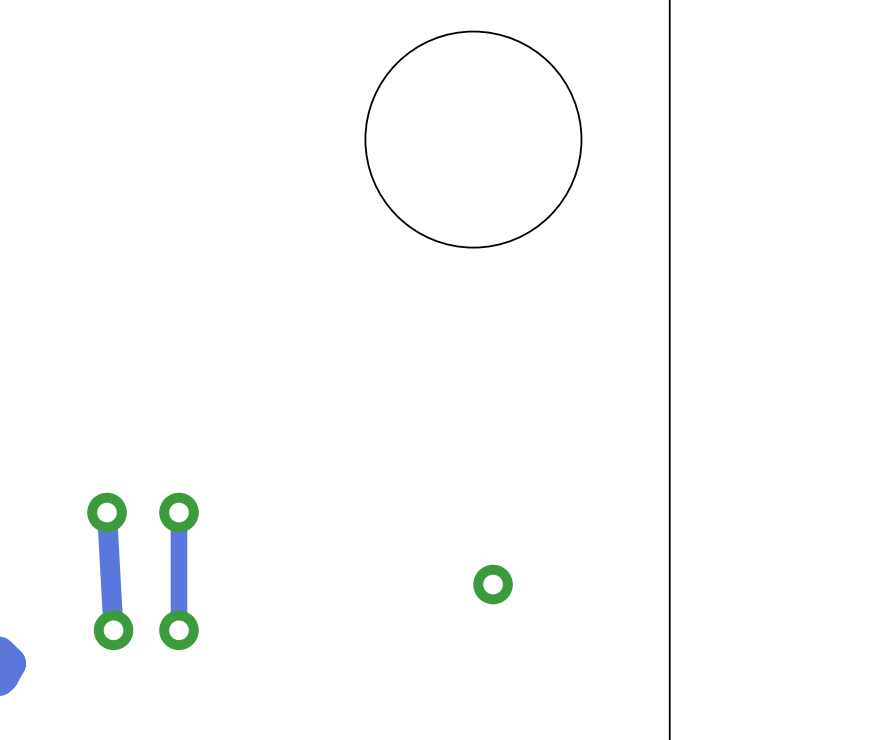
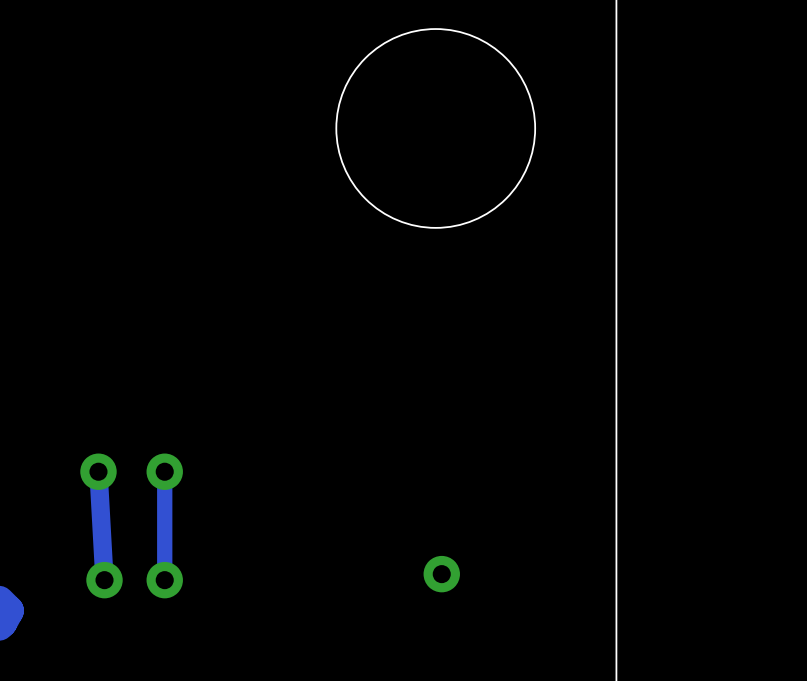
via position: (493, 584) -> (441, 574)

